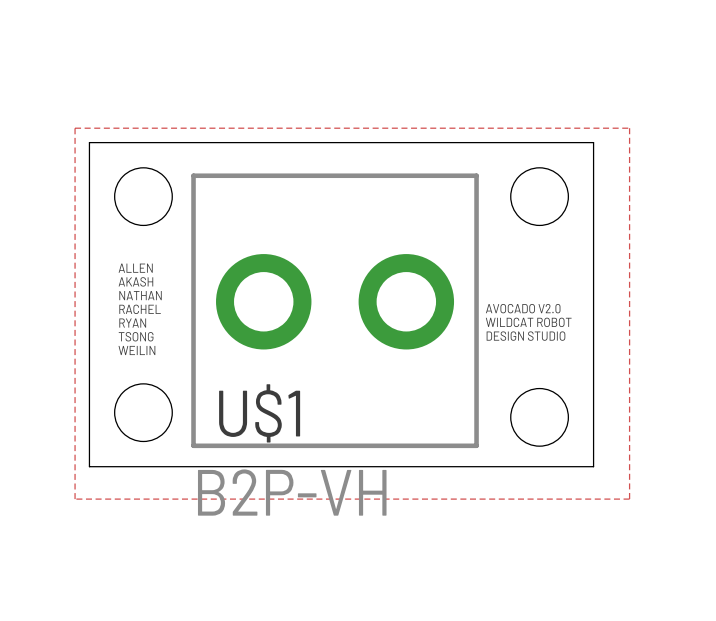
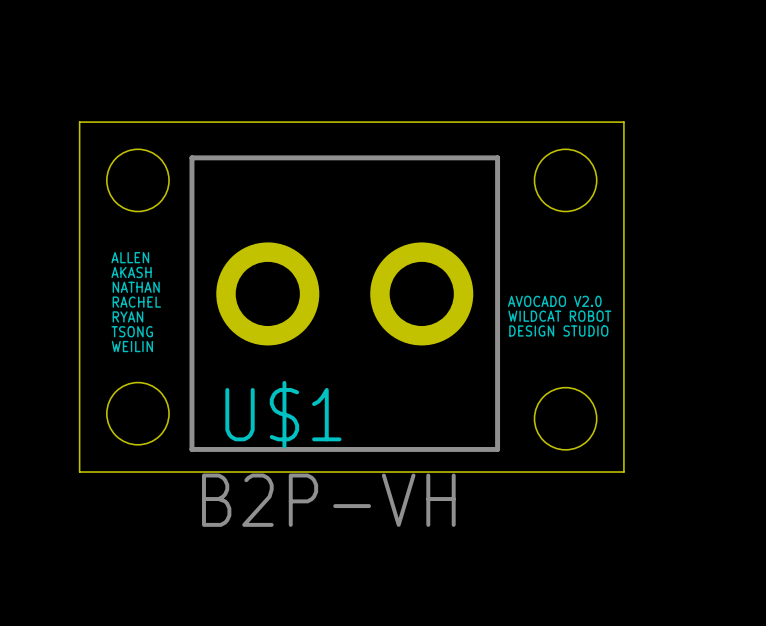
zone outline: (75, 128) (629, 128) (629, 499) (75, 499) (75, 128) -> none

